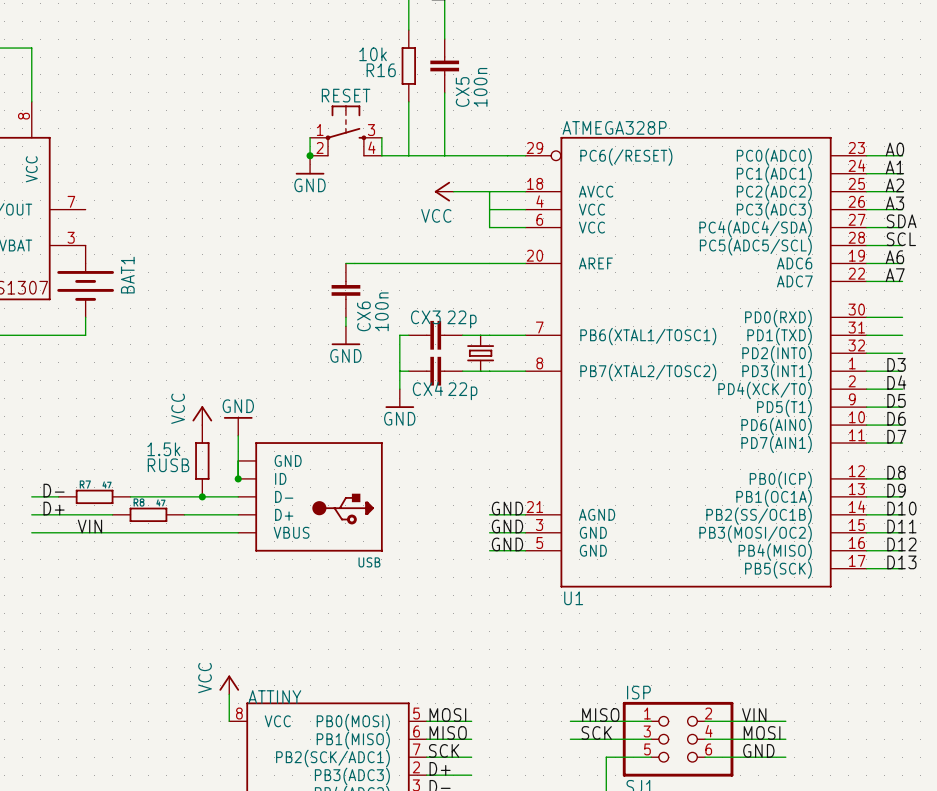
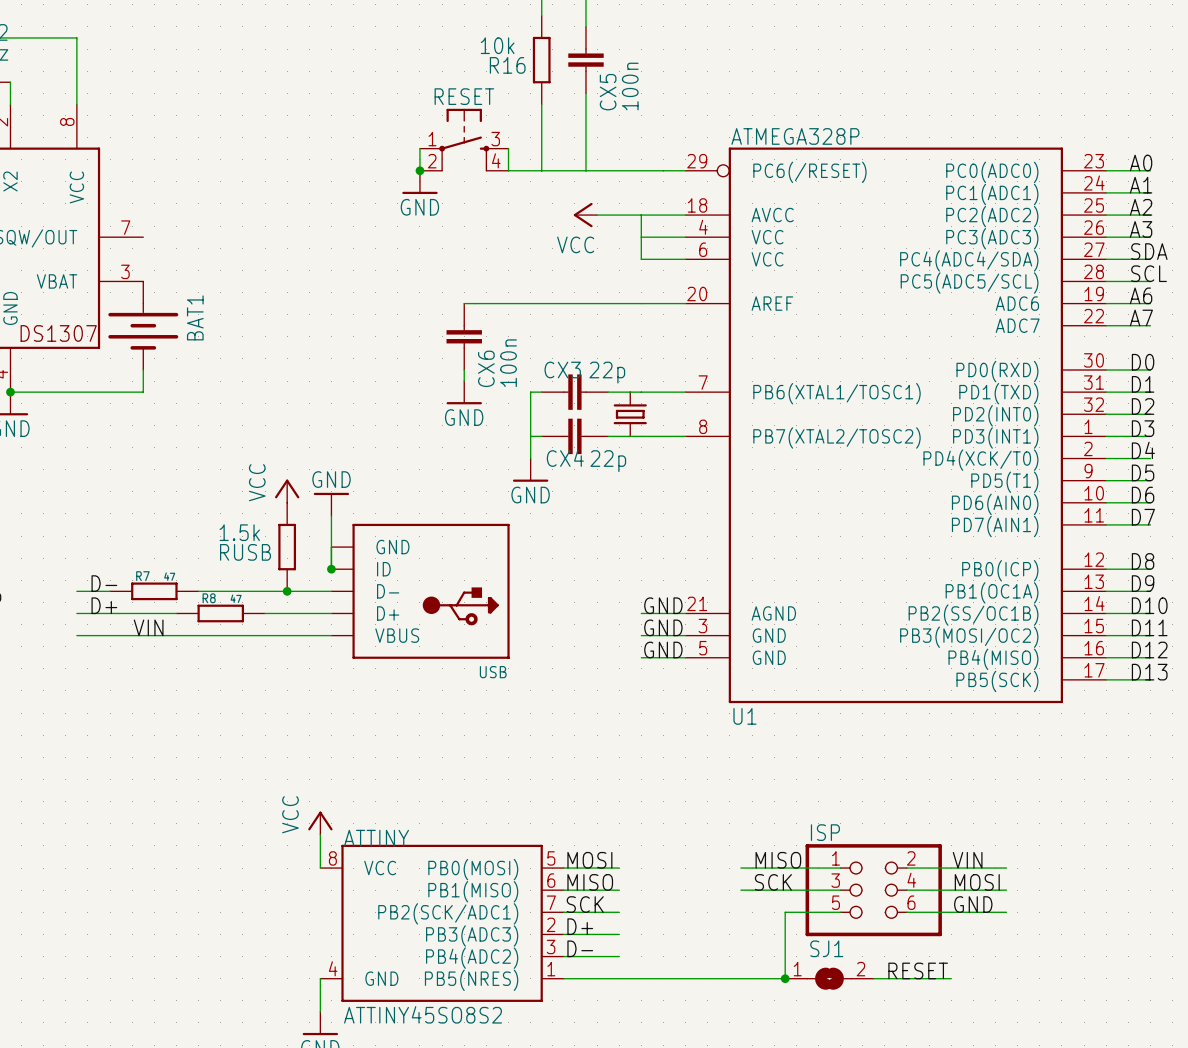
label: none -> D0 (1143, 362)
label: none -> D1 (1143, 384)
label: none -> D2 (1143, 406)

